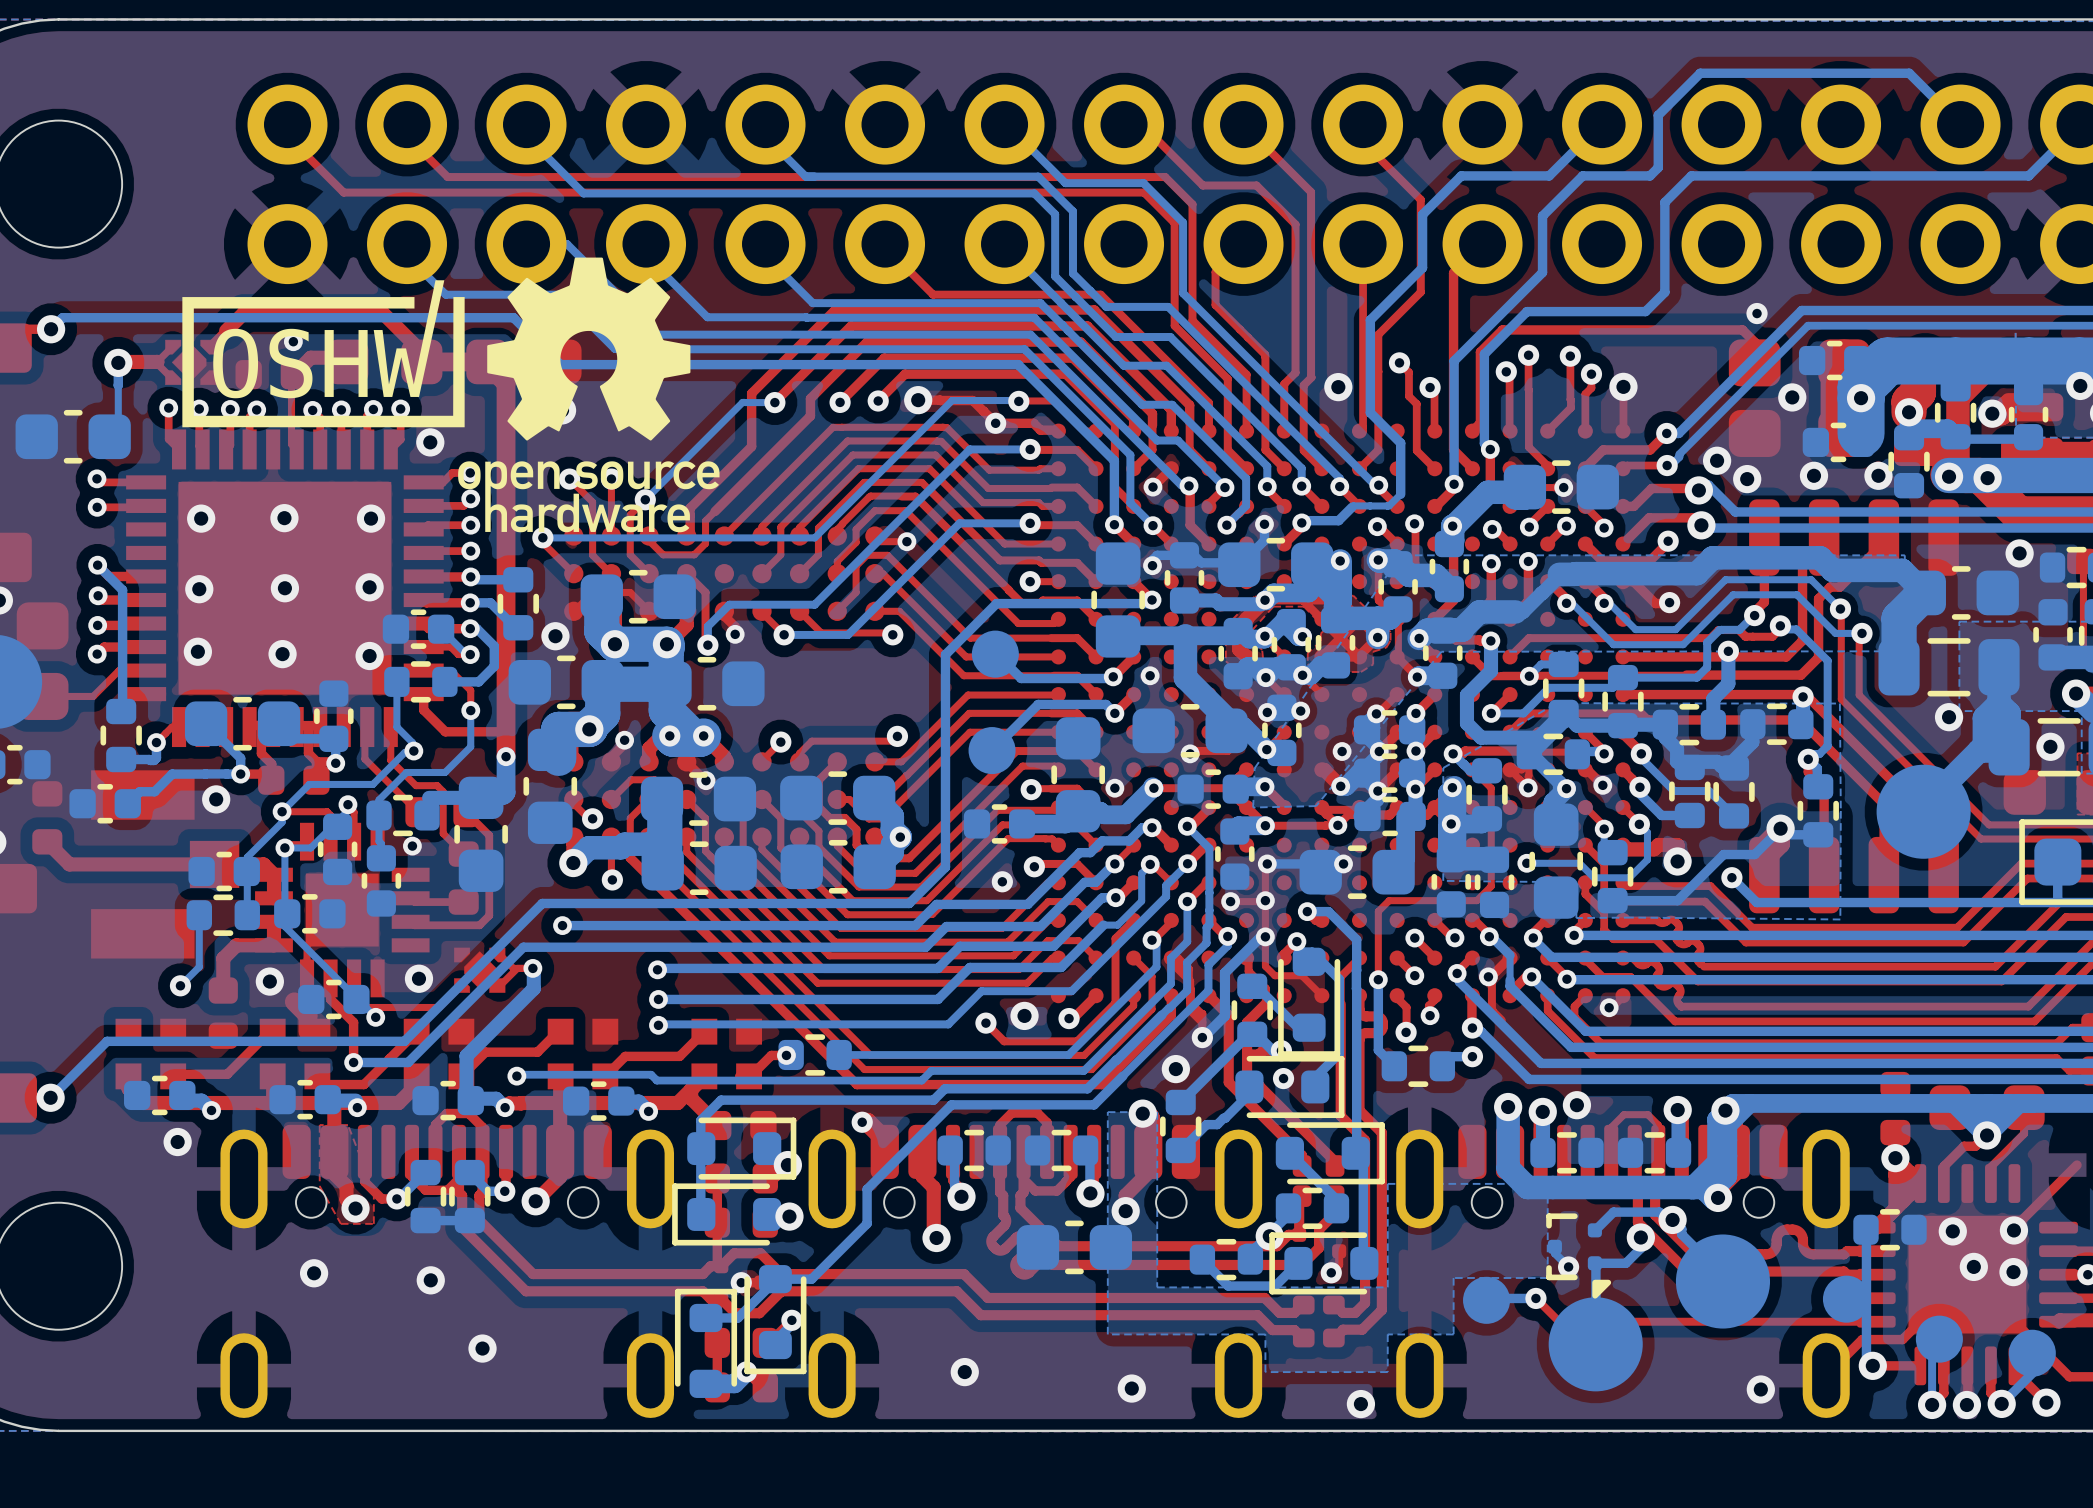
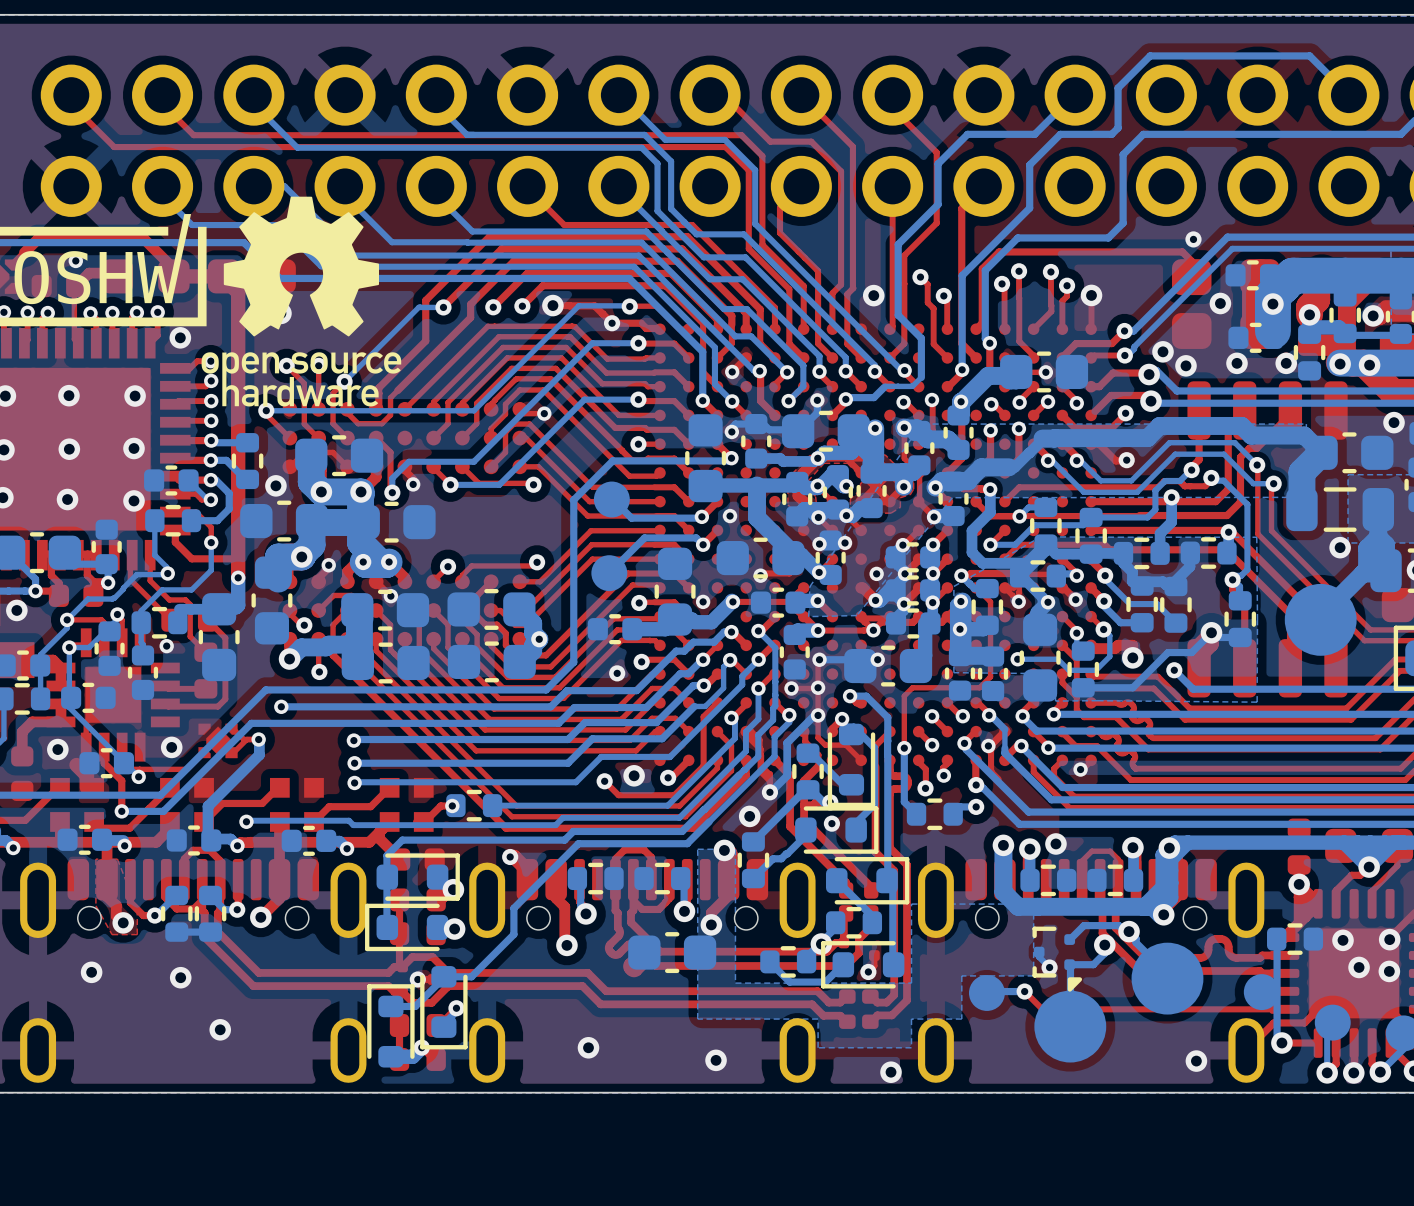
bottom track: (404, 752) (372, 784) (341, 784) -> (160, 574) (136, 574) (112, 599)

